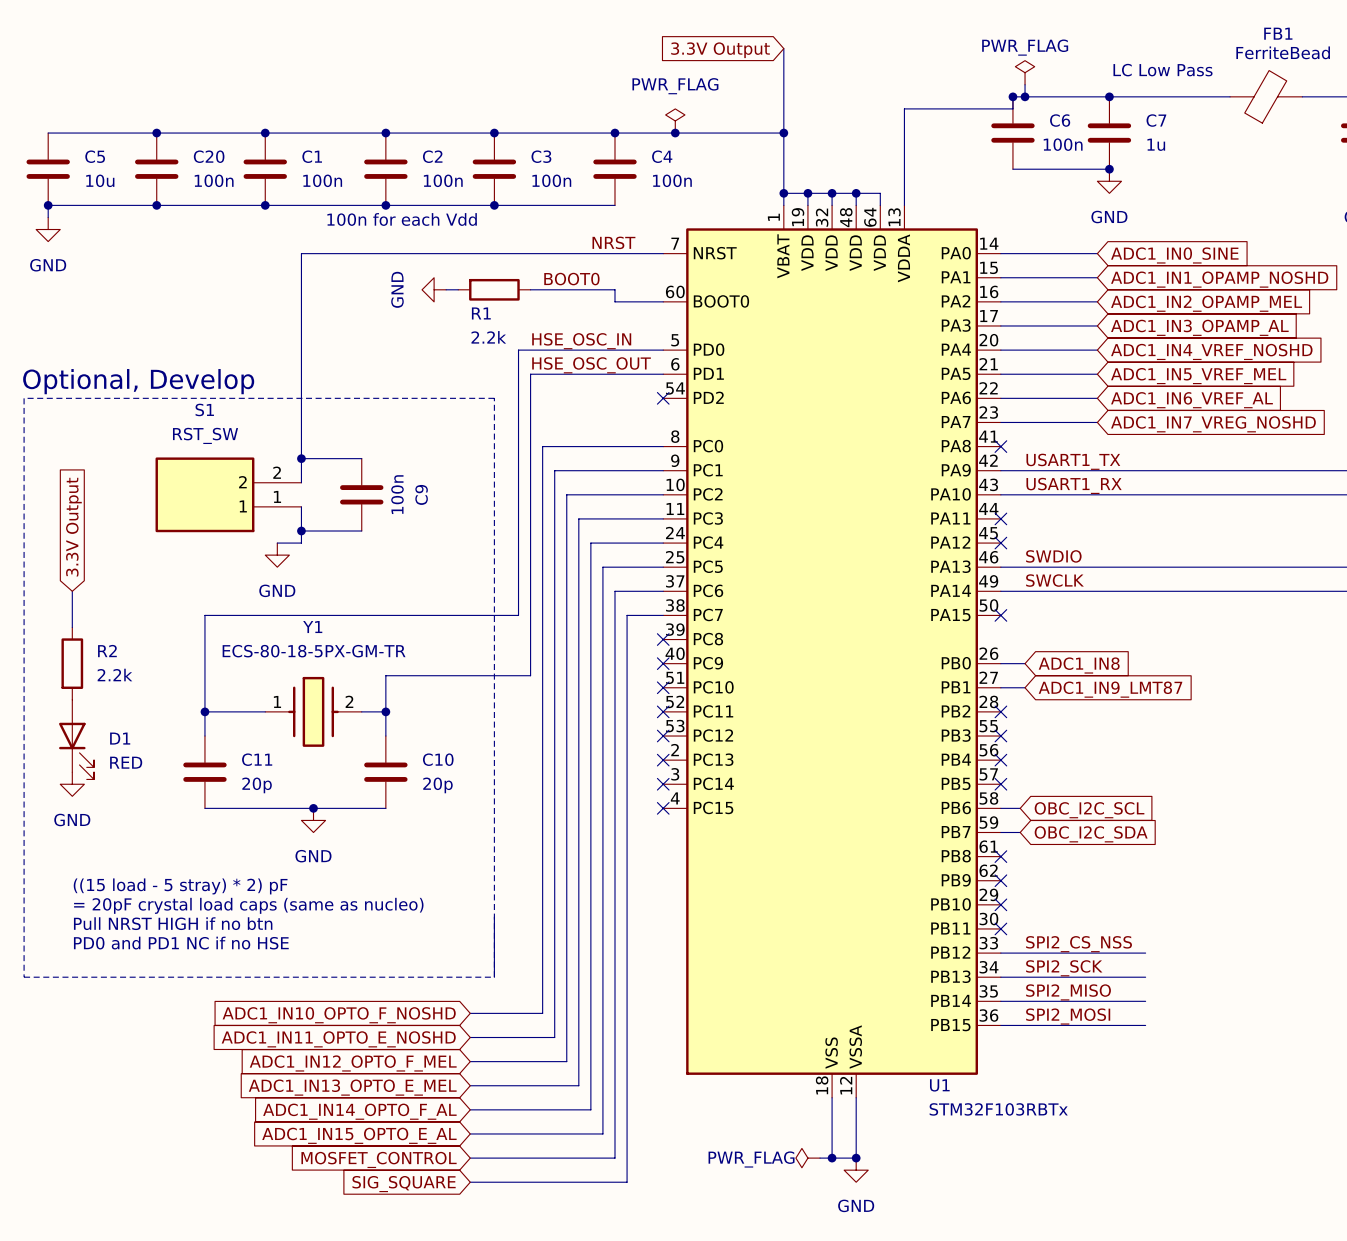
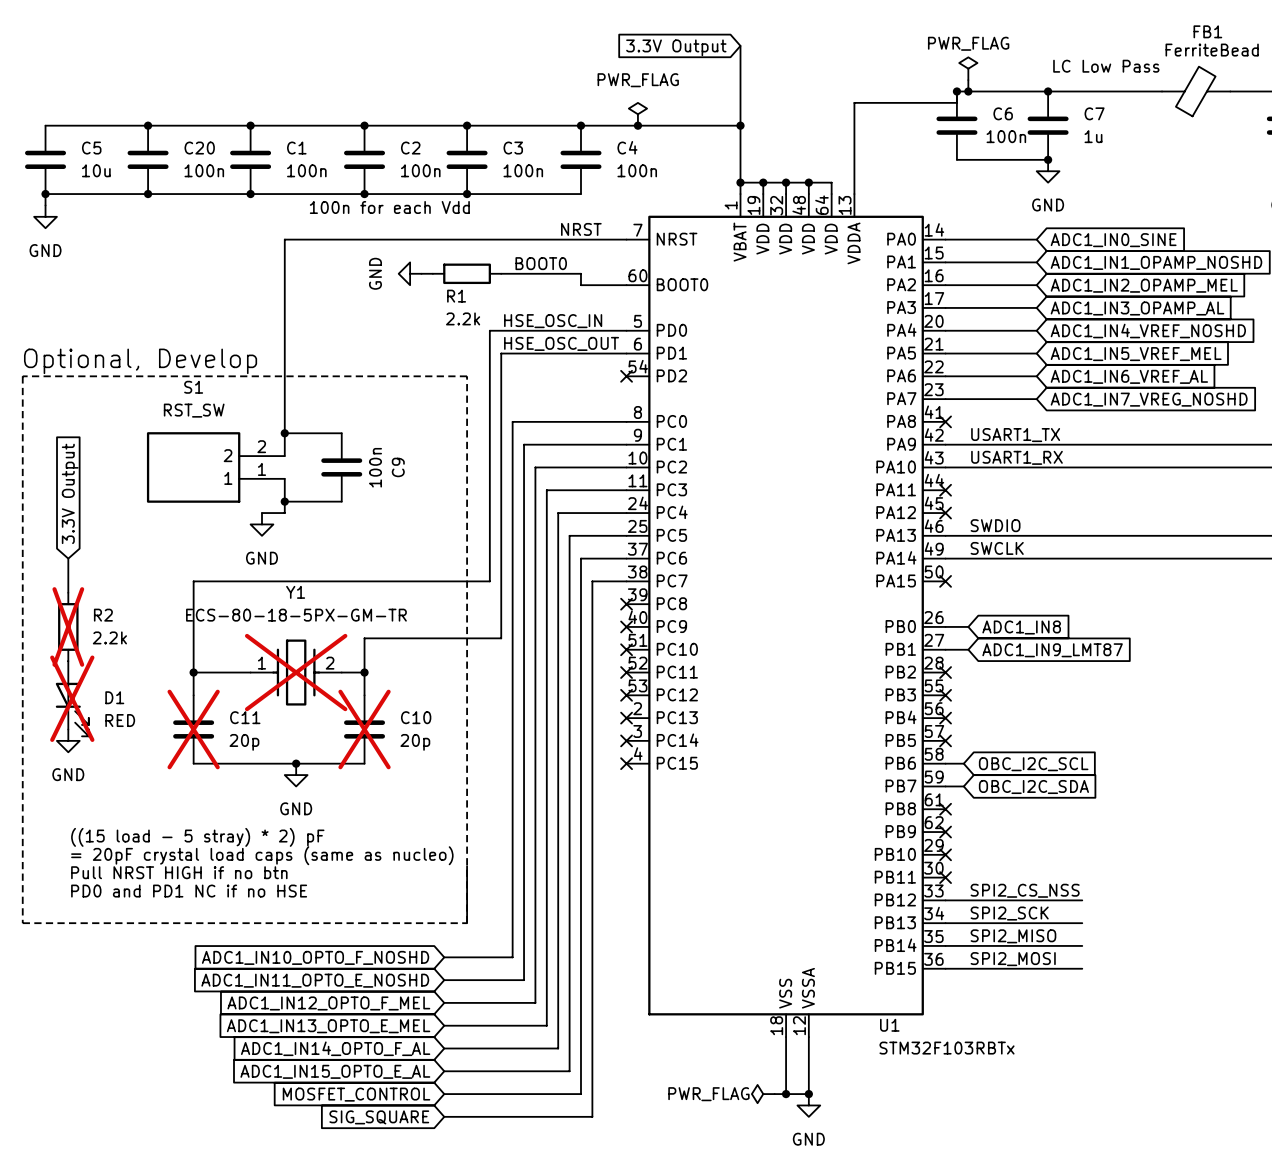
R2 do-not-place cross: none -> (68, 626)
Y1 do-not-place cross: none -> (296, 672)
D1 do-not-place cross: none -> (72, 698)
C11 do-not-place cross: none -> (193, 729)
C10 do-not-place cross: none -> (364, 729)

